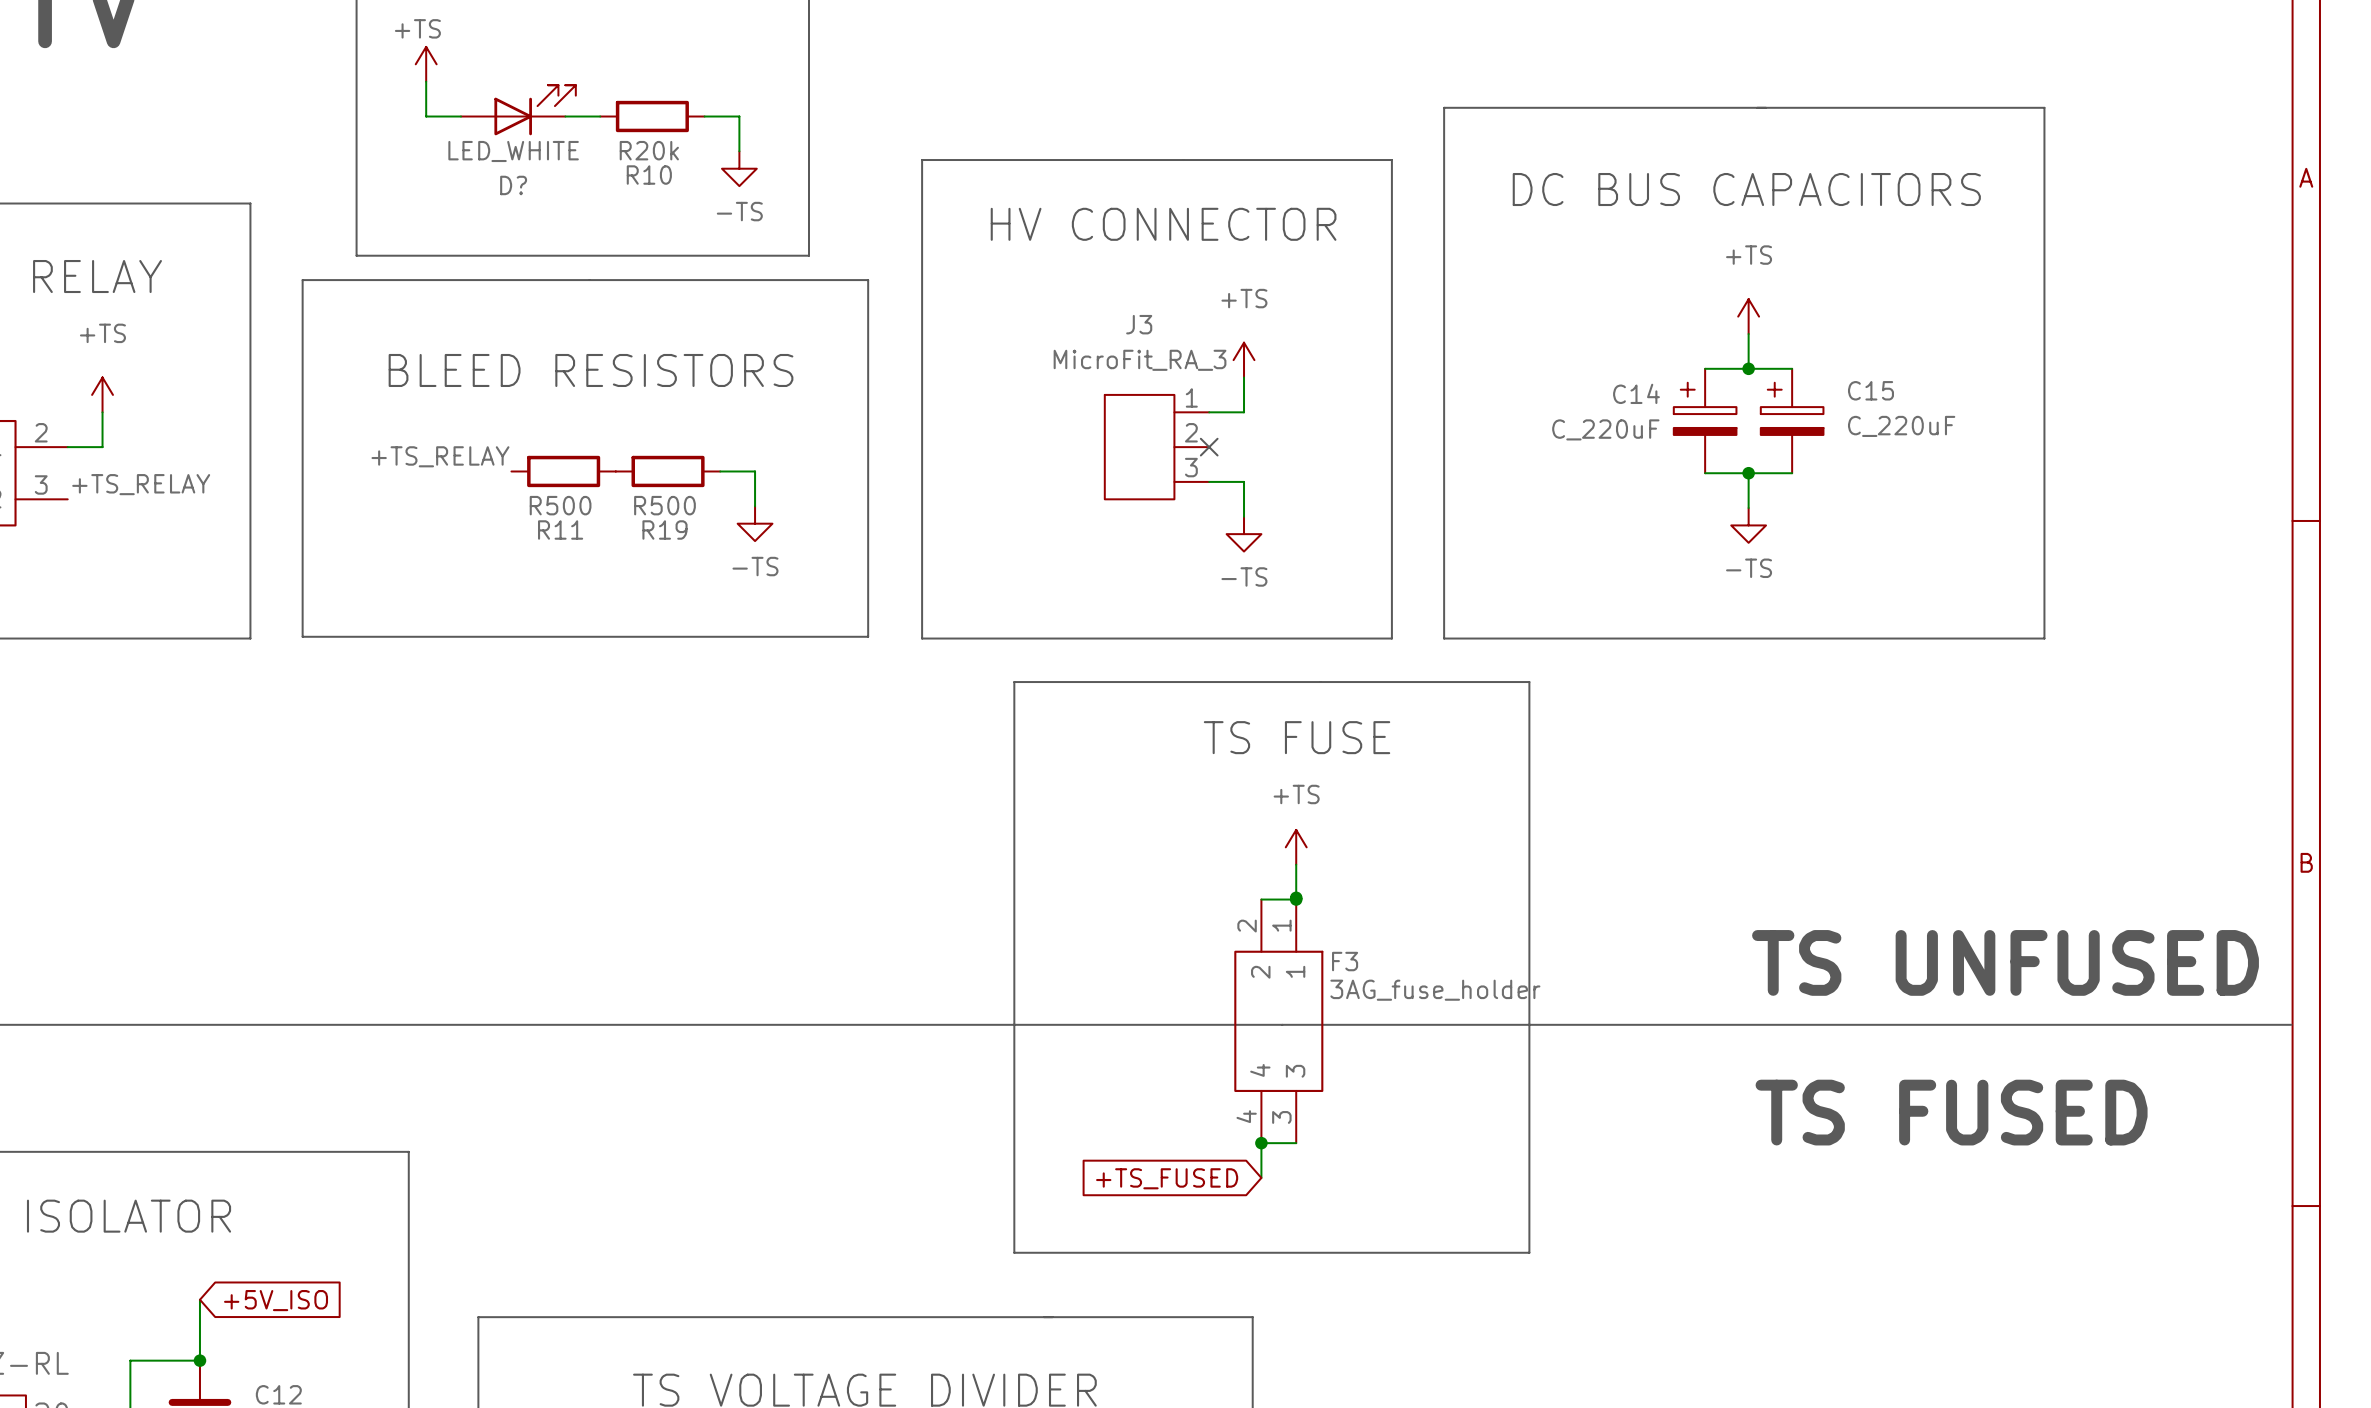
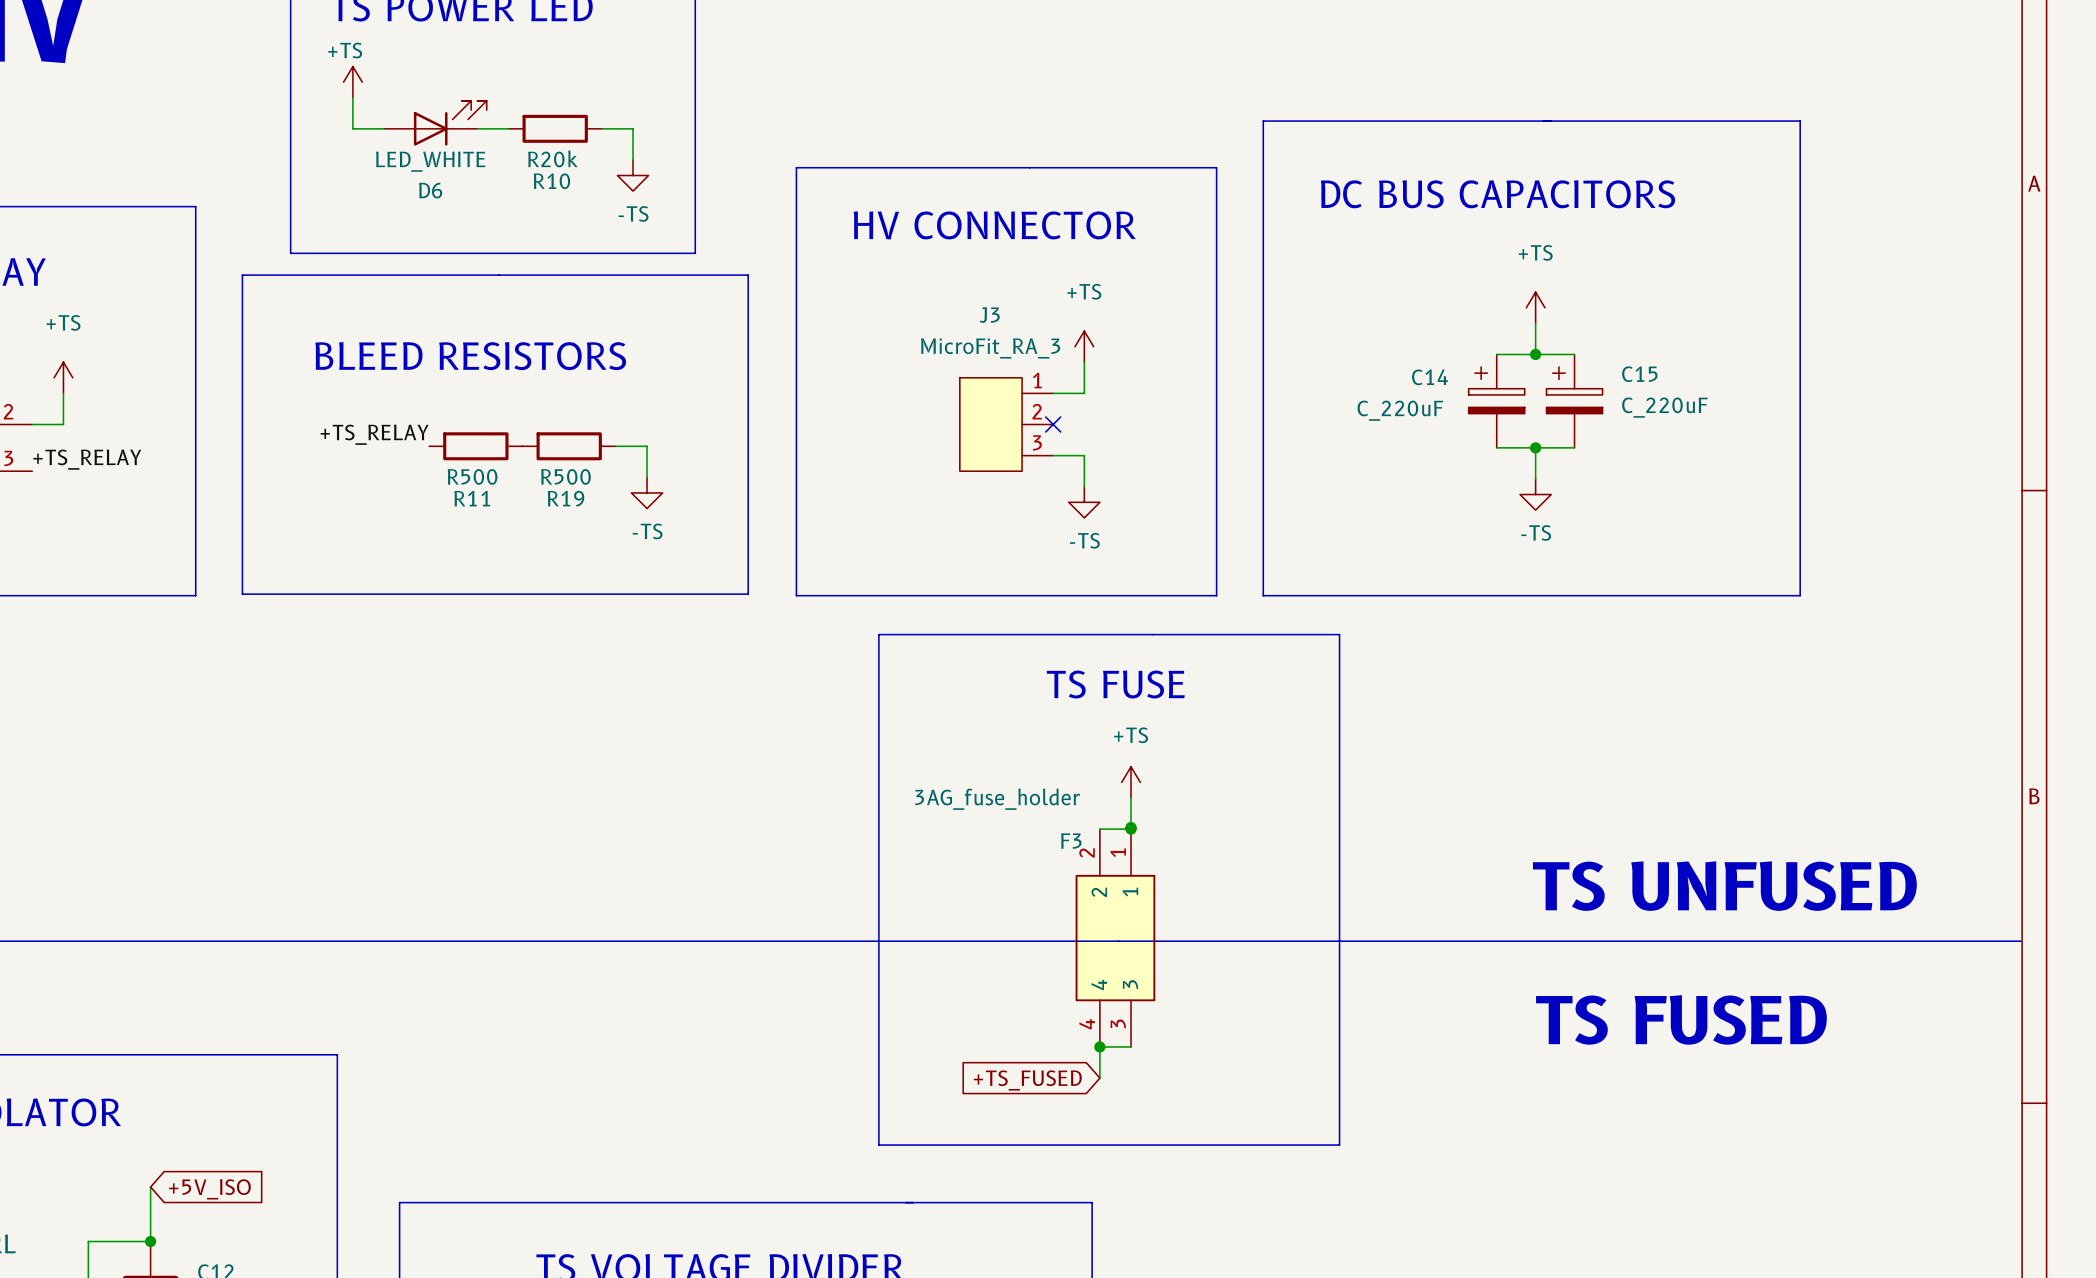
D? name: D? (513, 185) -> D6 (430, 190)
F3 symbol: [1234, 899, 1324, 1144] -> [1075, 829, 1156, 1047]
F3 name position: F3 (1345, 961) -> F3 (1071, 841)
F3 value position: 3AG_fuse_holder (1435, 990) -> 3AG_fuse_holder (997, 799)

